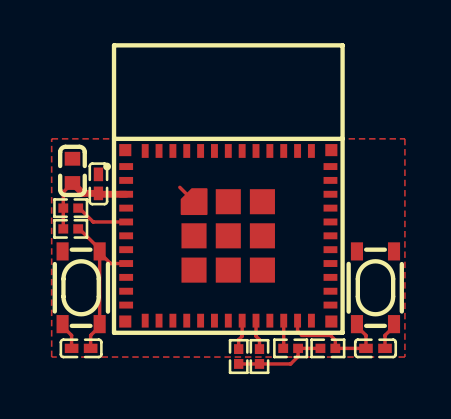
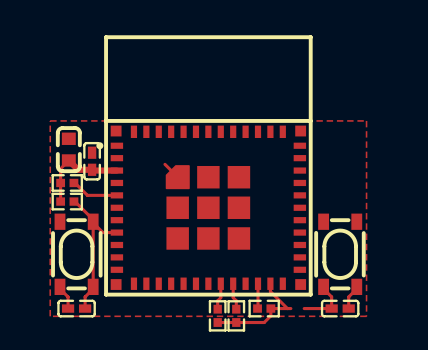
top track: (297, 329) (301, 335) (330, 335) (335, 340) (335, 348) -> (270, 291) (287, 308)
part: (327, 348) -> none

